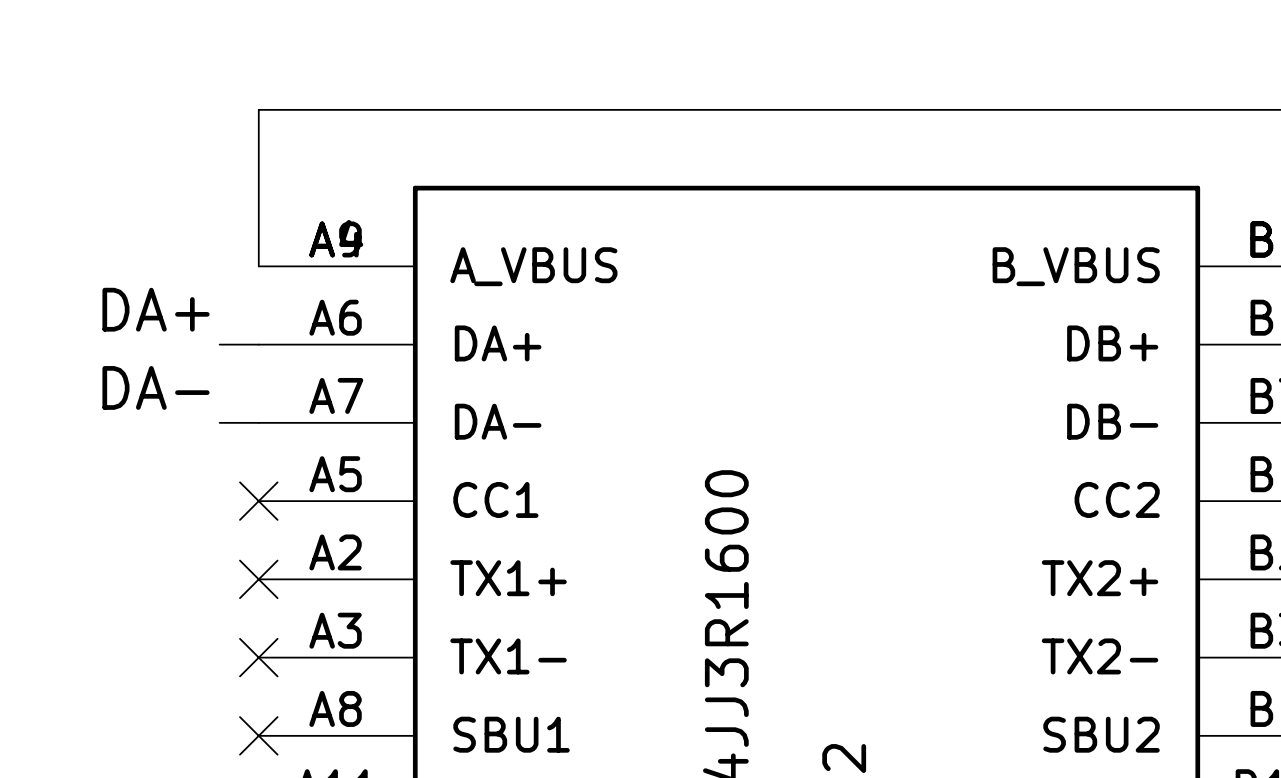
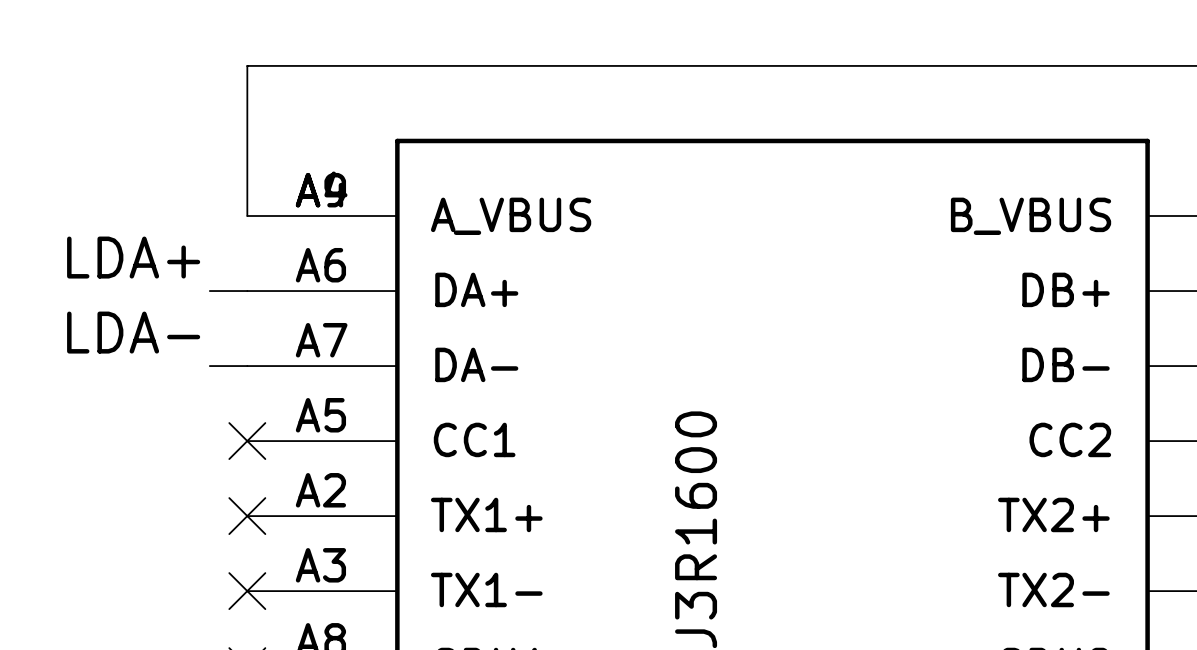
label: DA+ (156, 309) -> LDA+ (133, 257)
label: DA- (156, 387) -> LDA- (133, 332)

